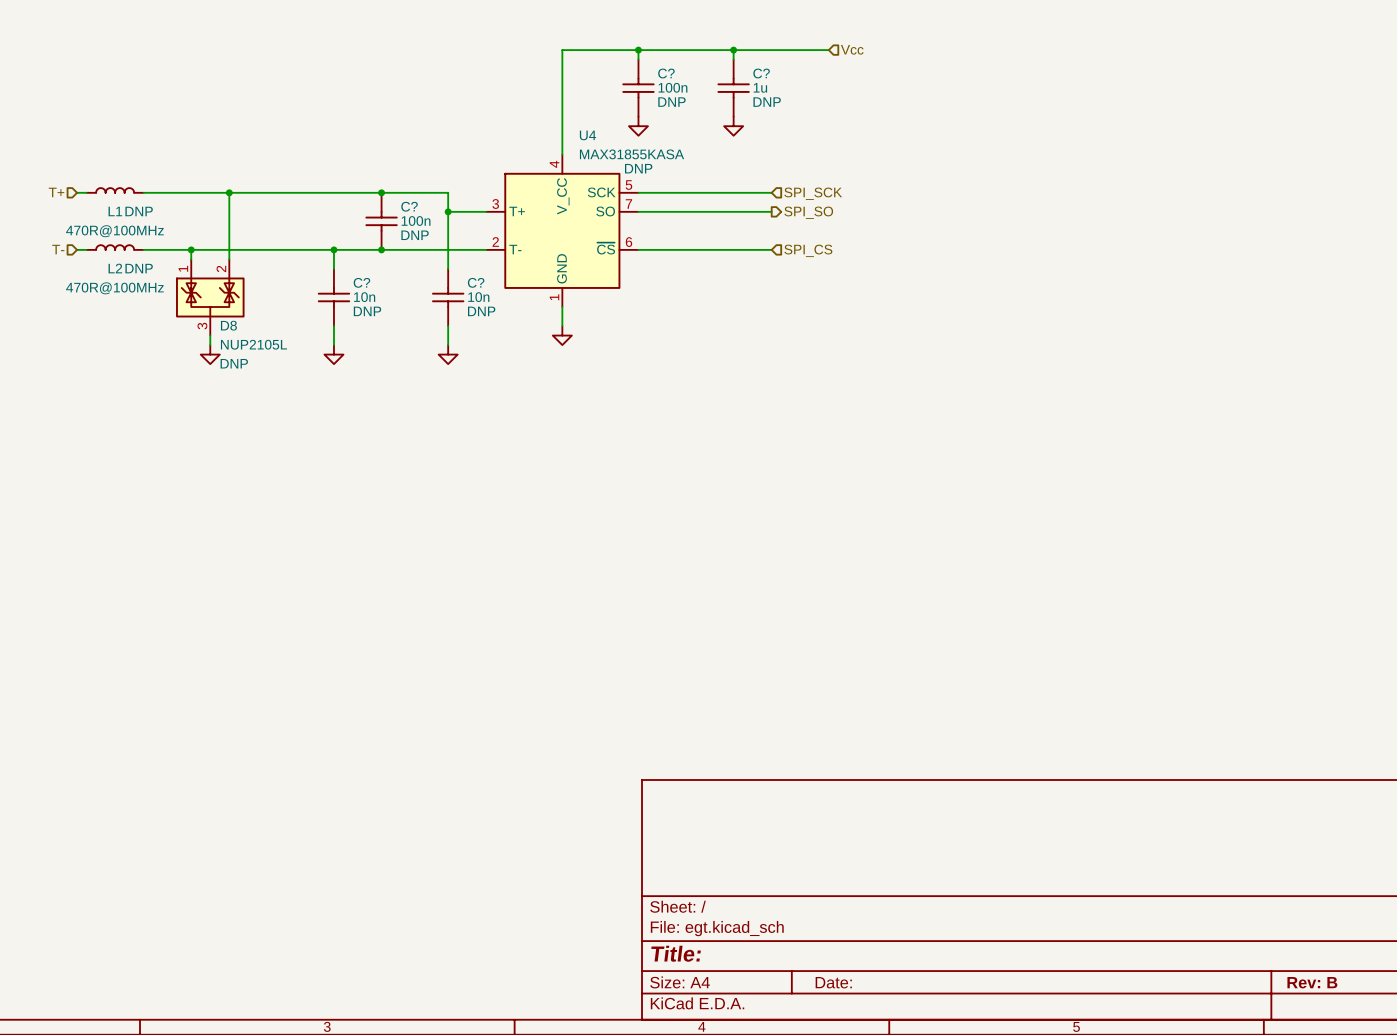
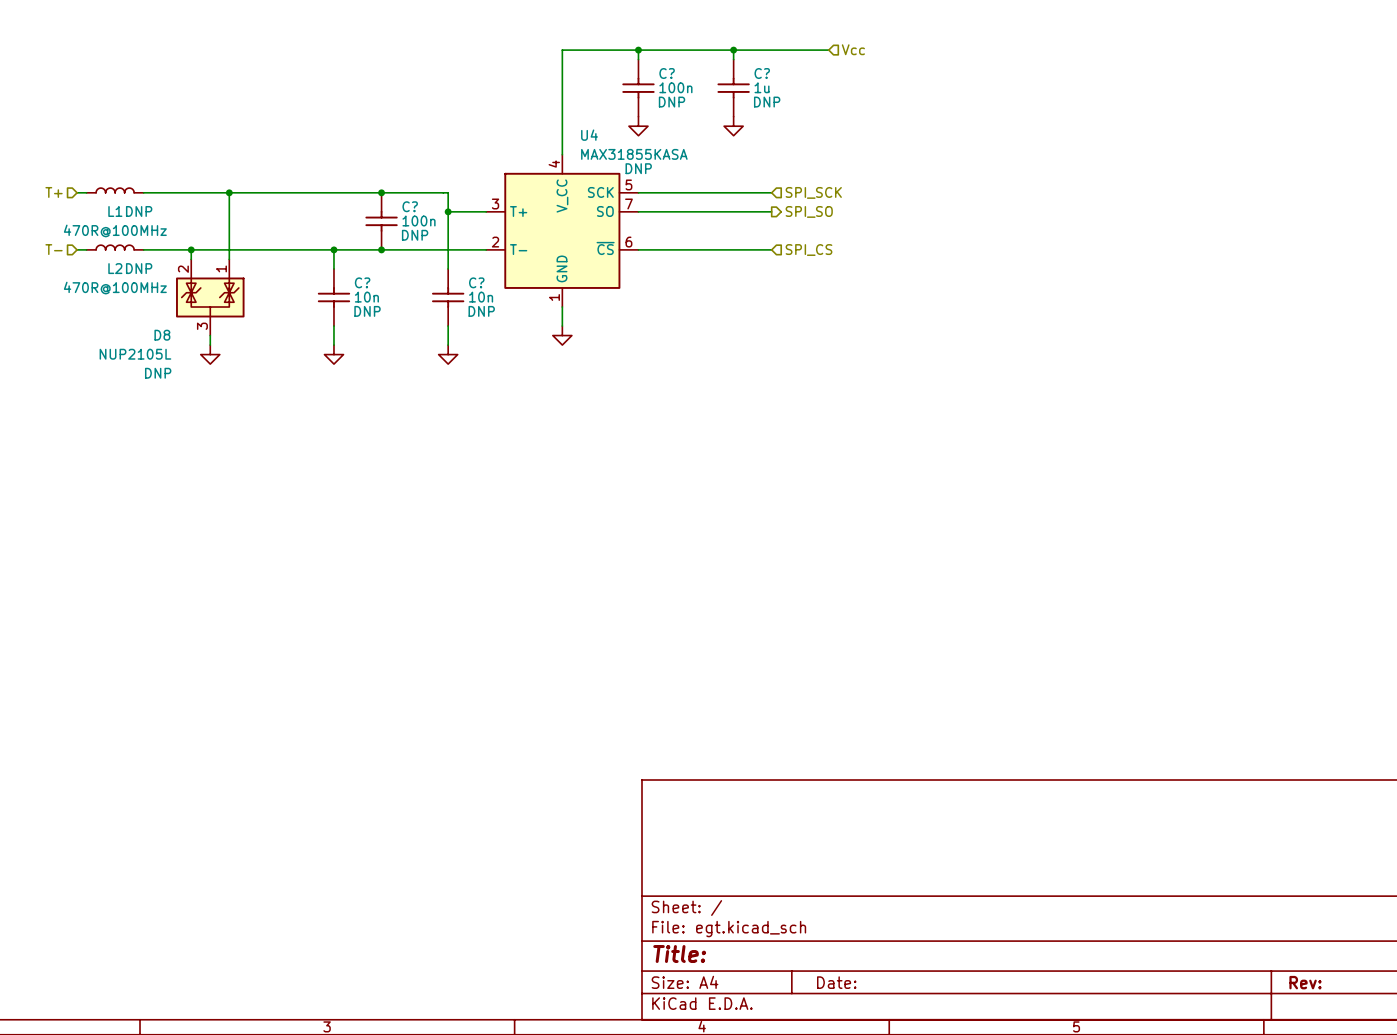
D8 flip: as is (210, 297) -> left-right (210, 297)
D8 name position: D8 (228, 325) -> D8 (162, 335)
D8 value position: NUP2105L (253, 344) -> NUP2105L (135, 354)
D8 text position: DNP (234, 363) -> DNP (158, 373)
title block: Rev: B (1312, 982) -> Rev: (1305, 982)

